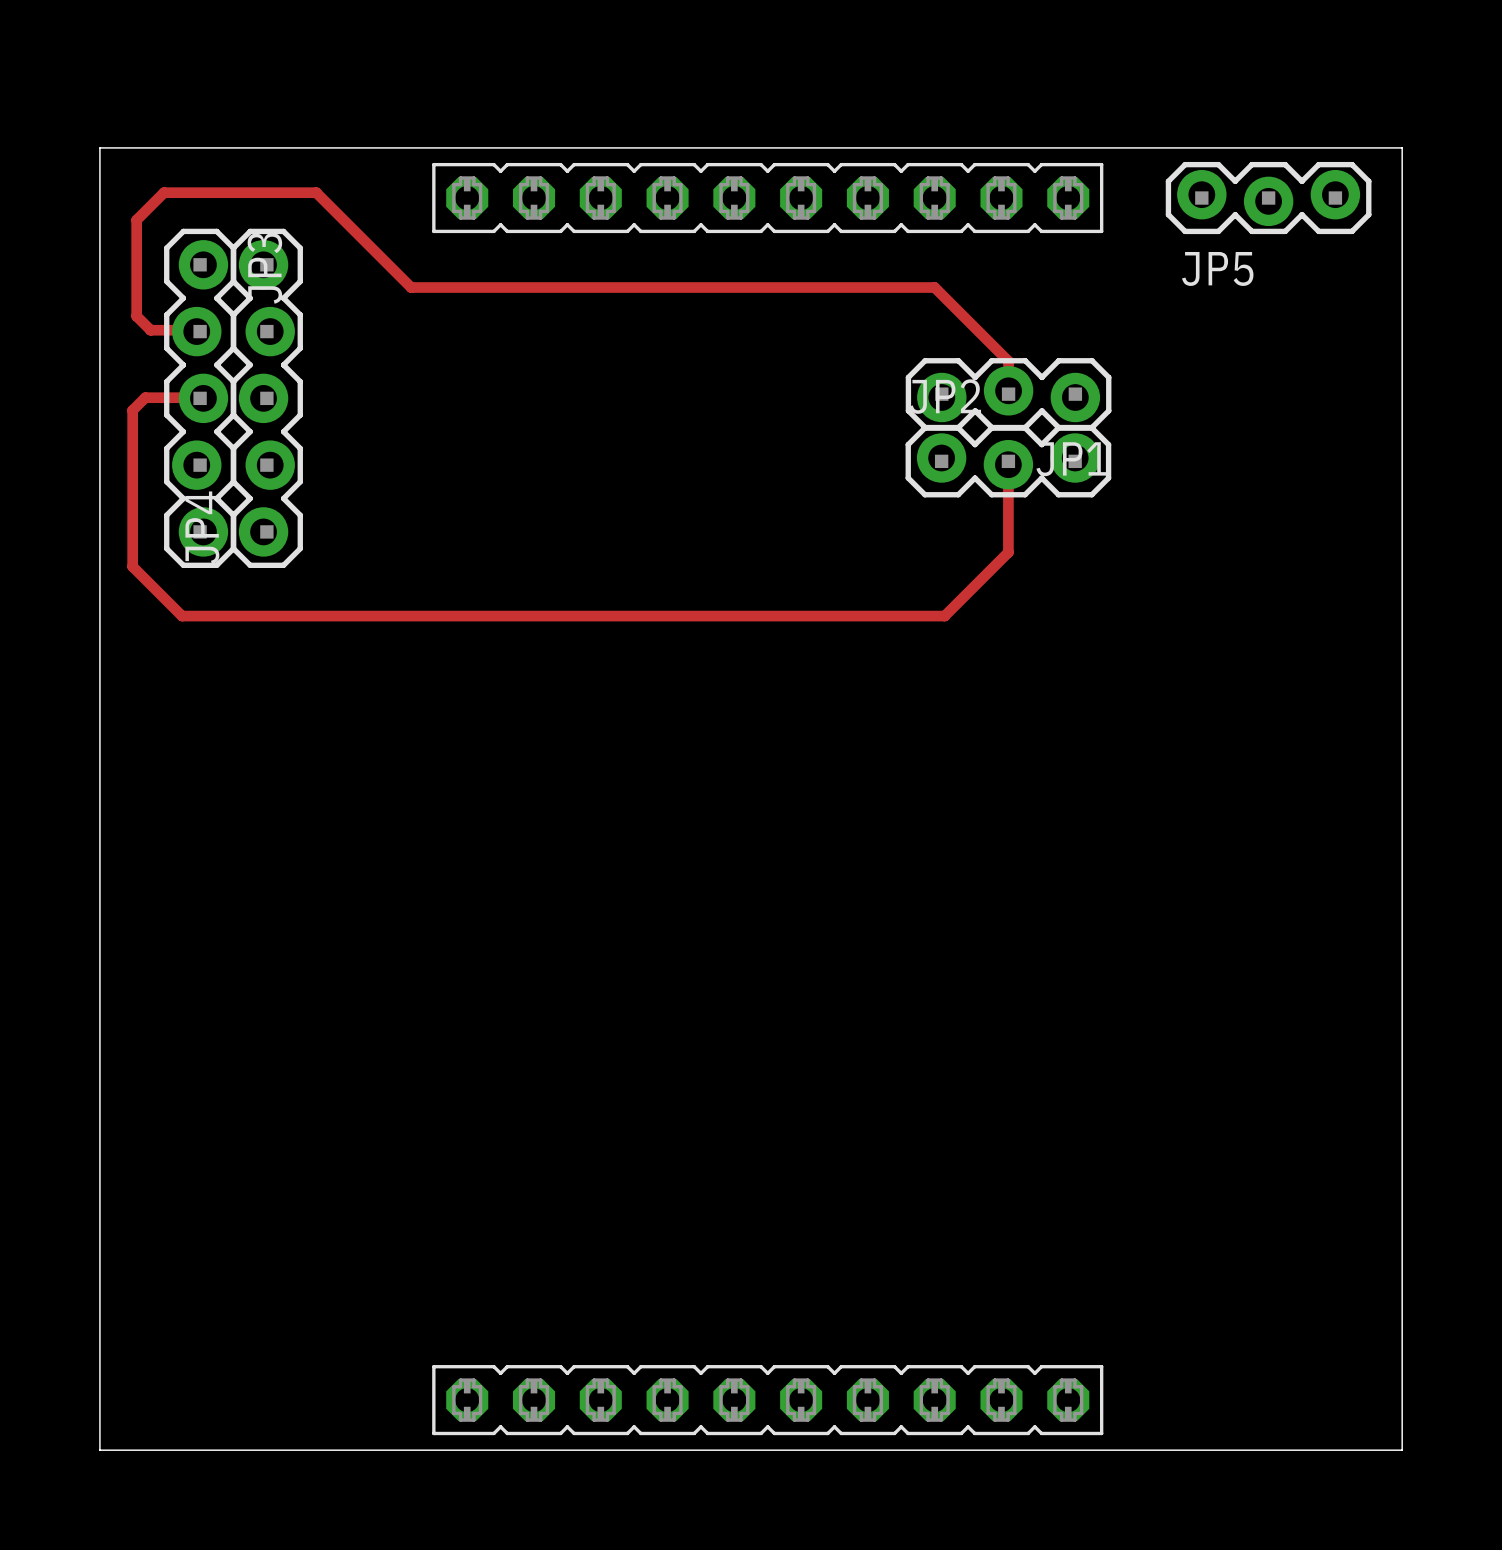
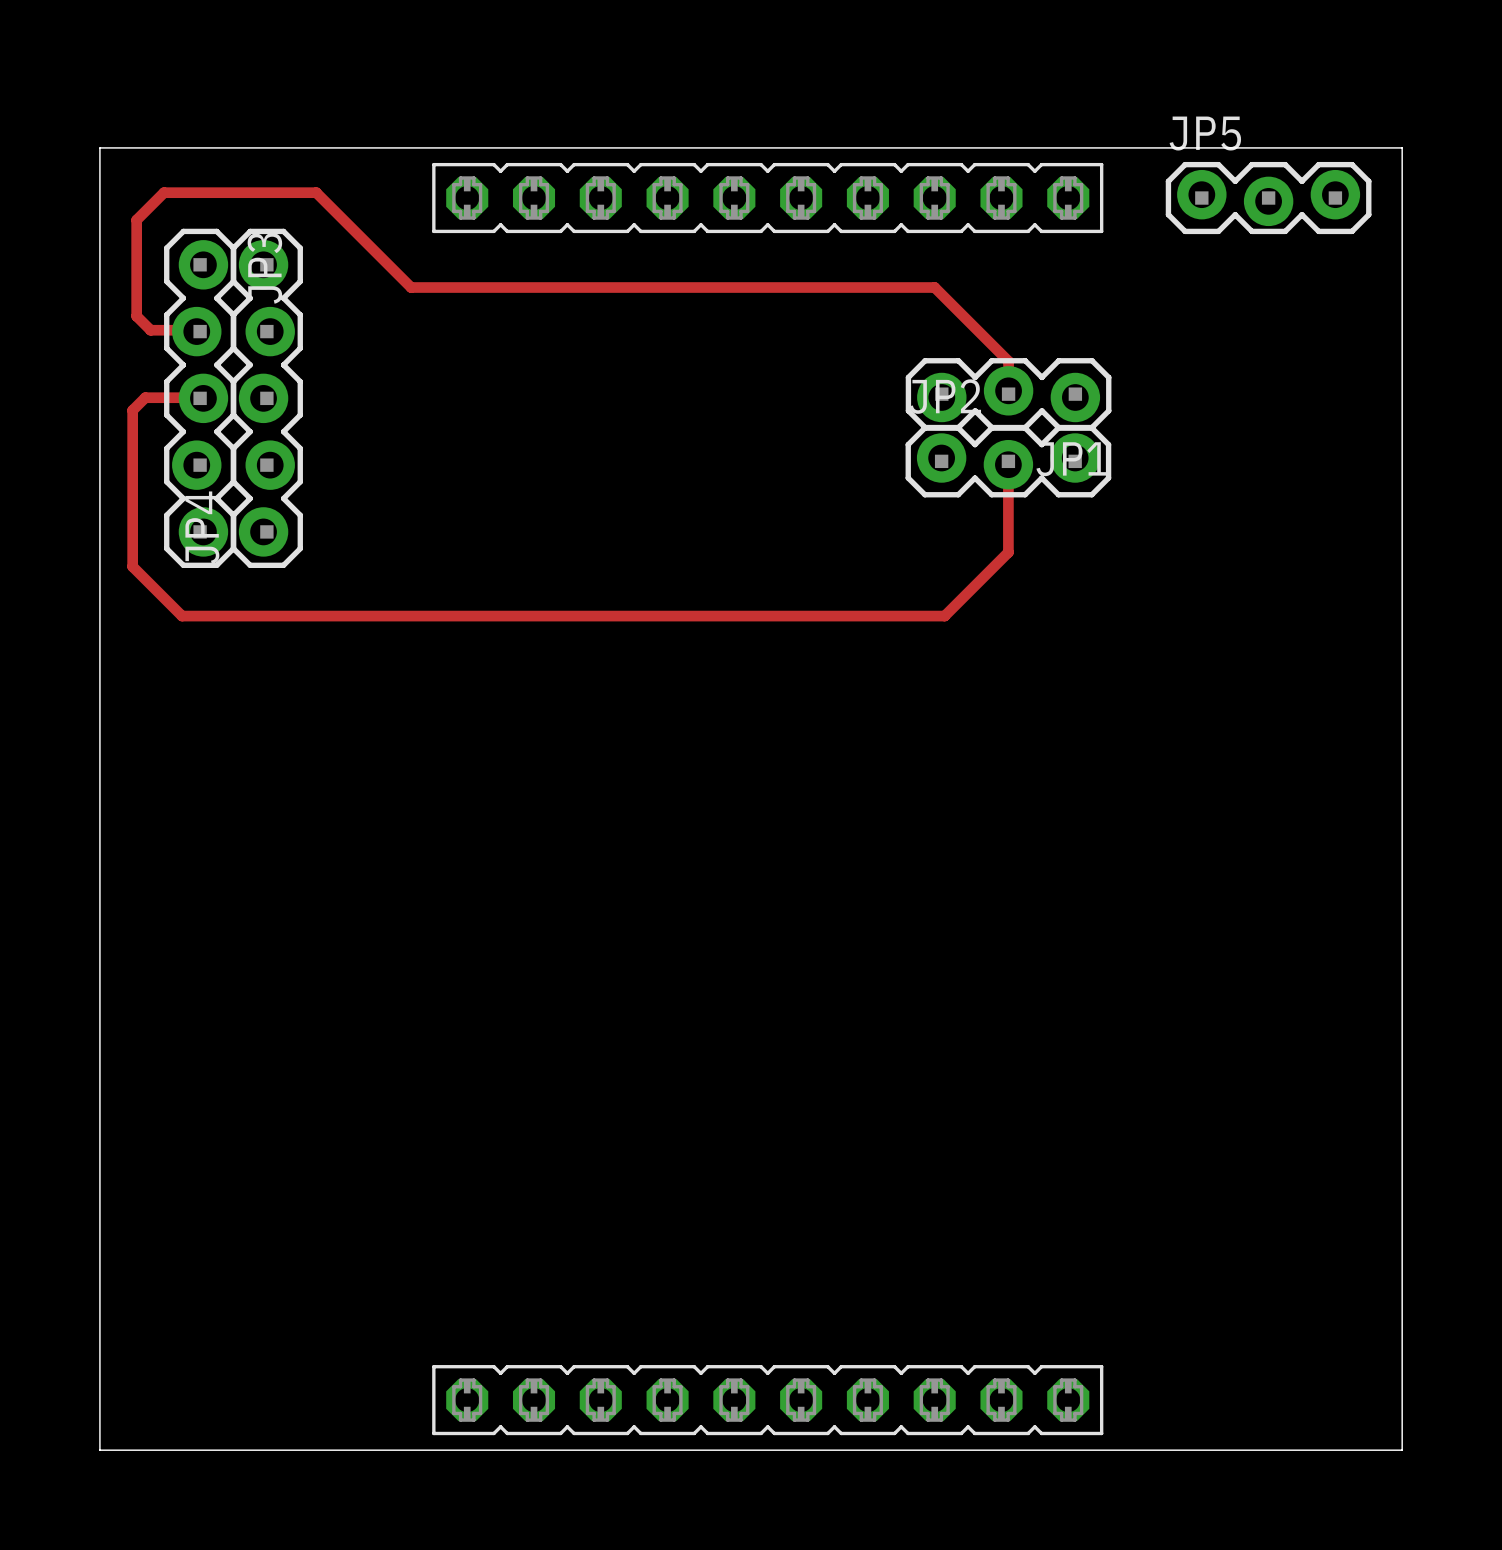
JP5 name position: JP5 (1217, 268) -> JP5 (1205, 133)

